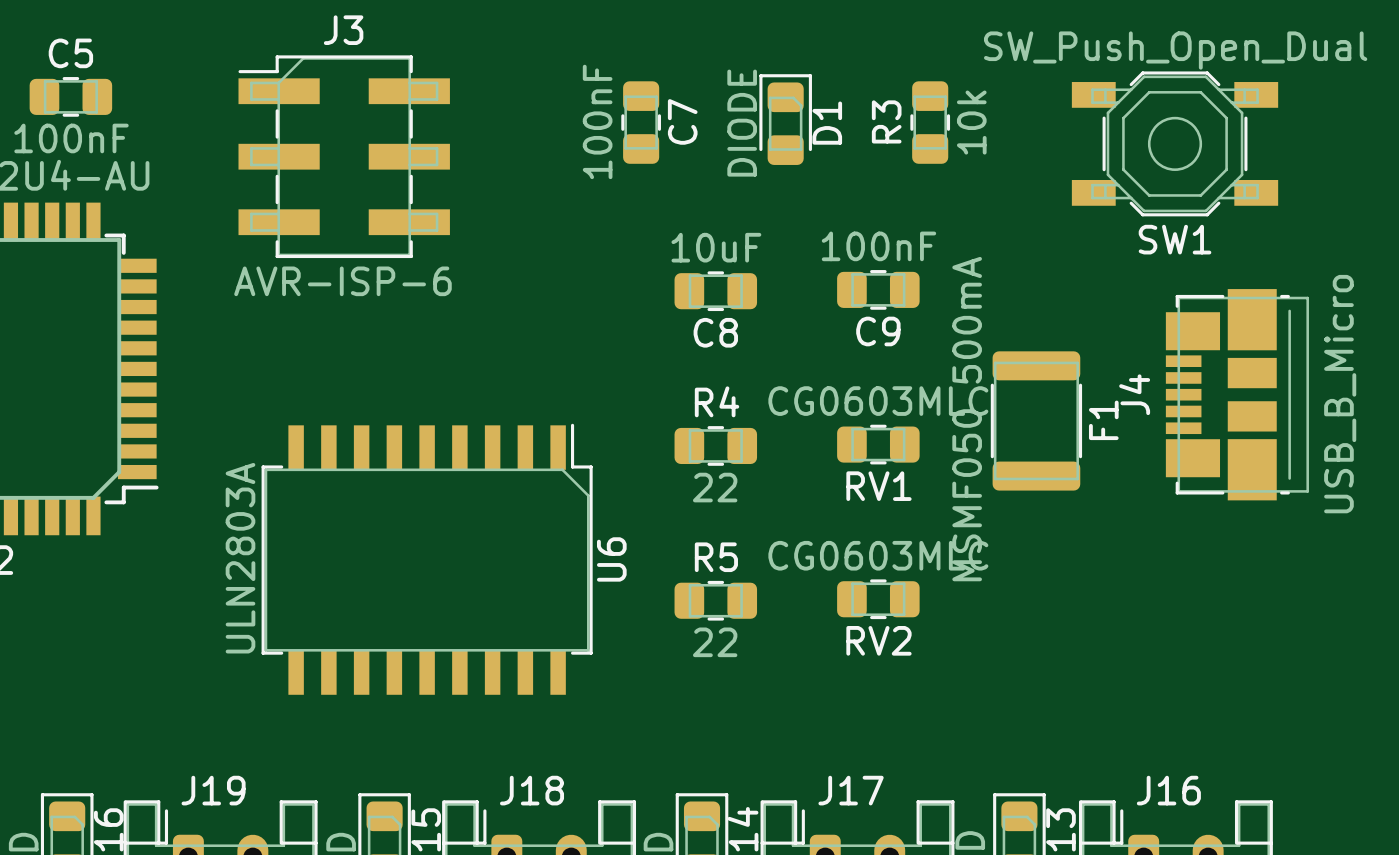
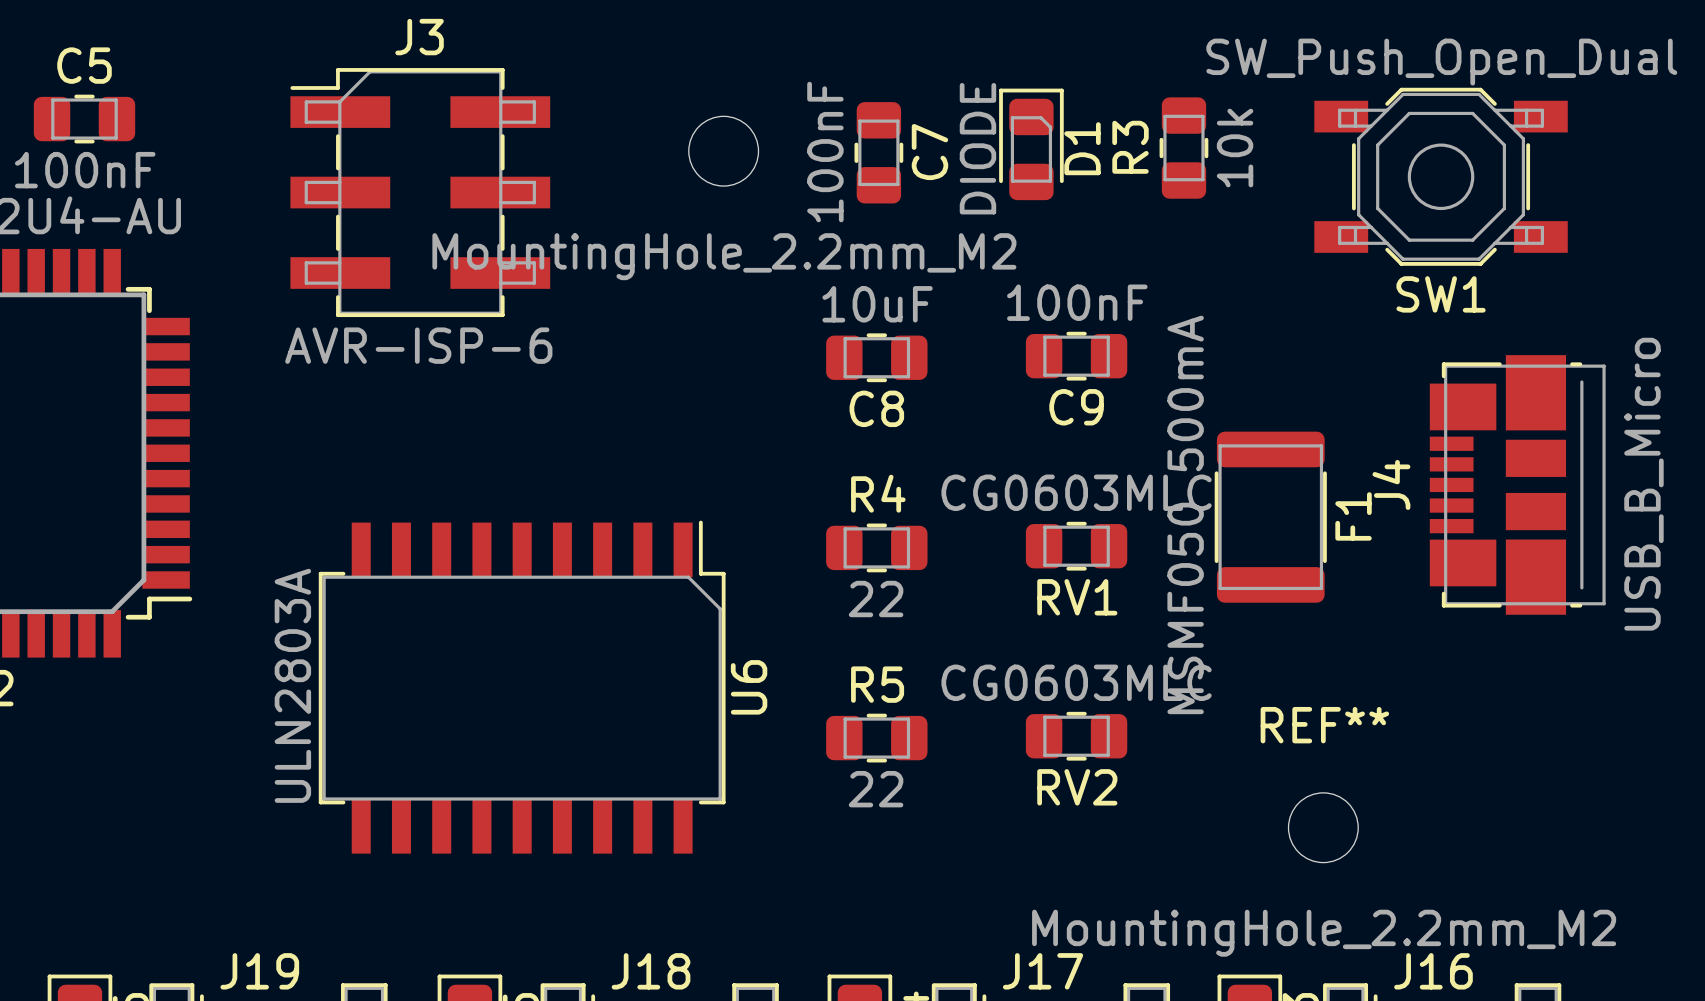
D1 position: (785, 119) -> (1031, 144)
C7 position: (641, 122) -> (878, 152)
R3 position: (930, 122) -> (1183, 148)
part: none -> MountingHole_2.2mm_M2 (723, 151)
REF**: none -> MountingHole_2.2mm_M2 (1323, 827)

